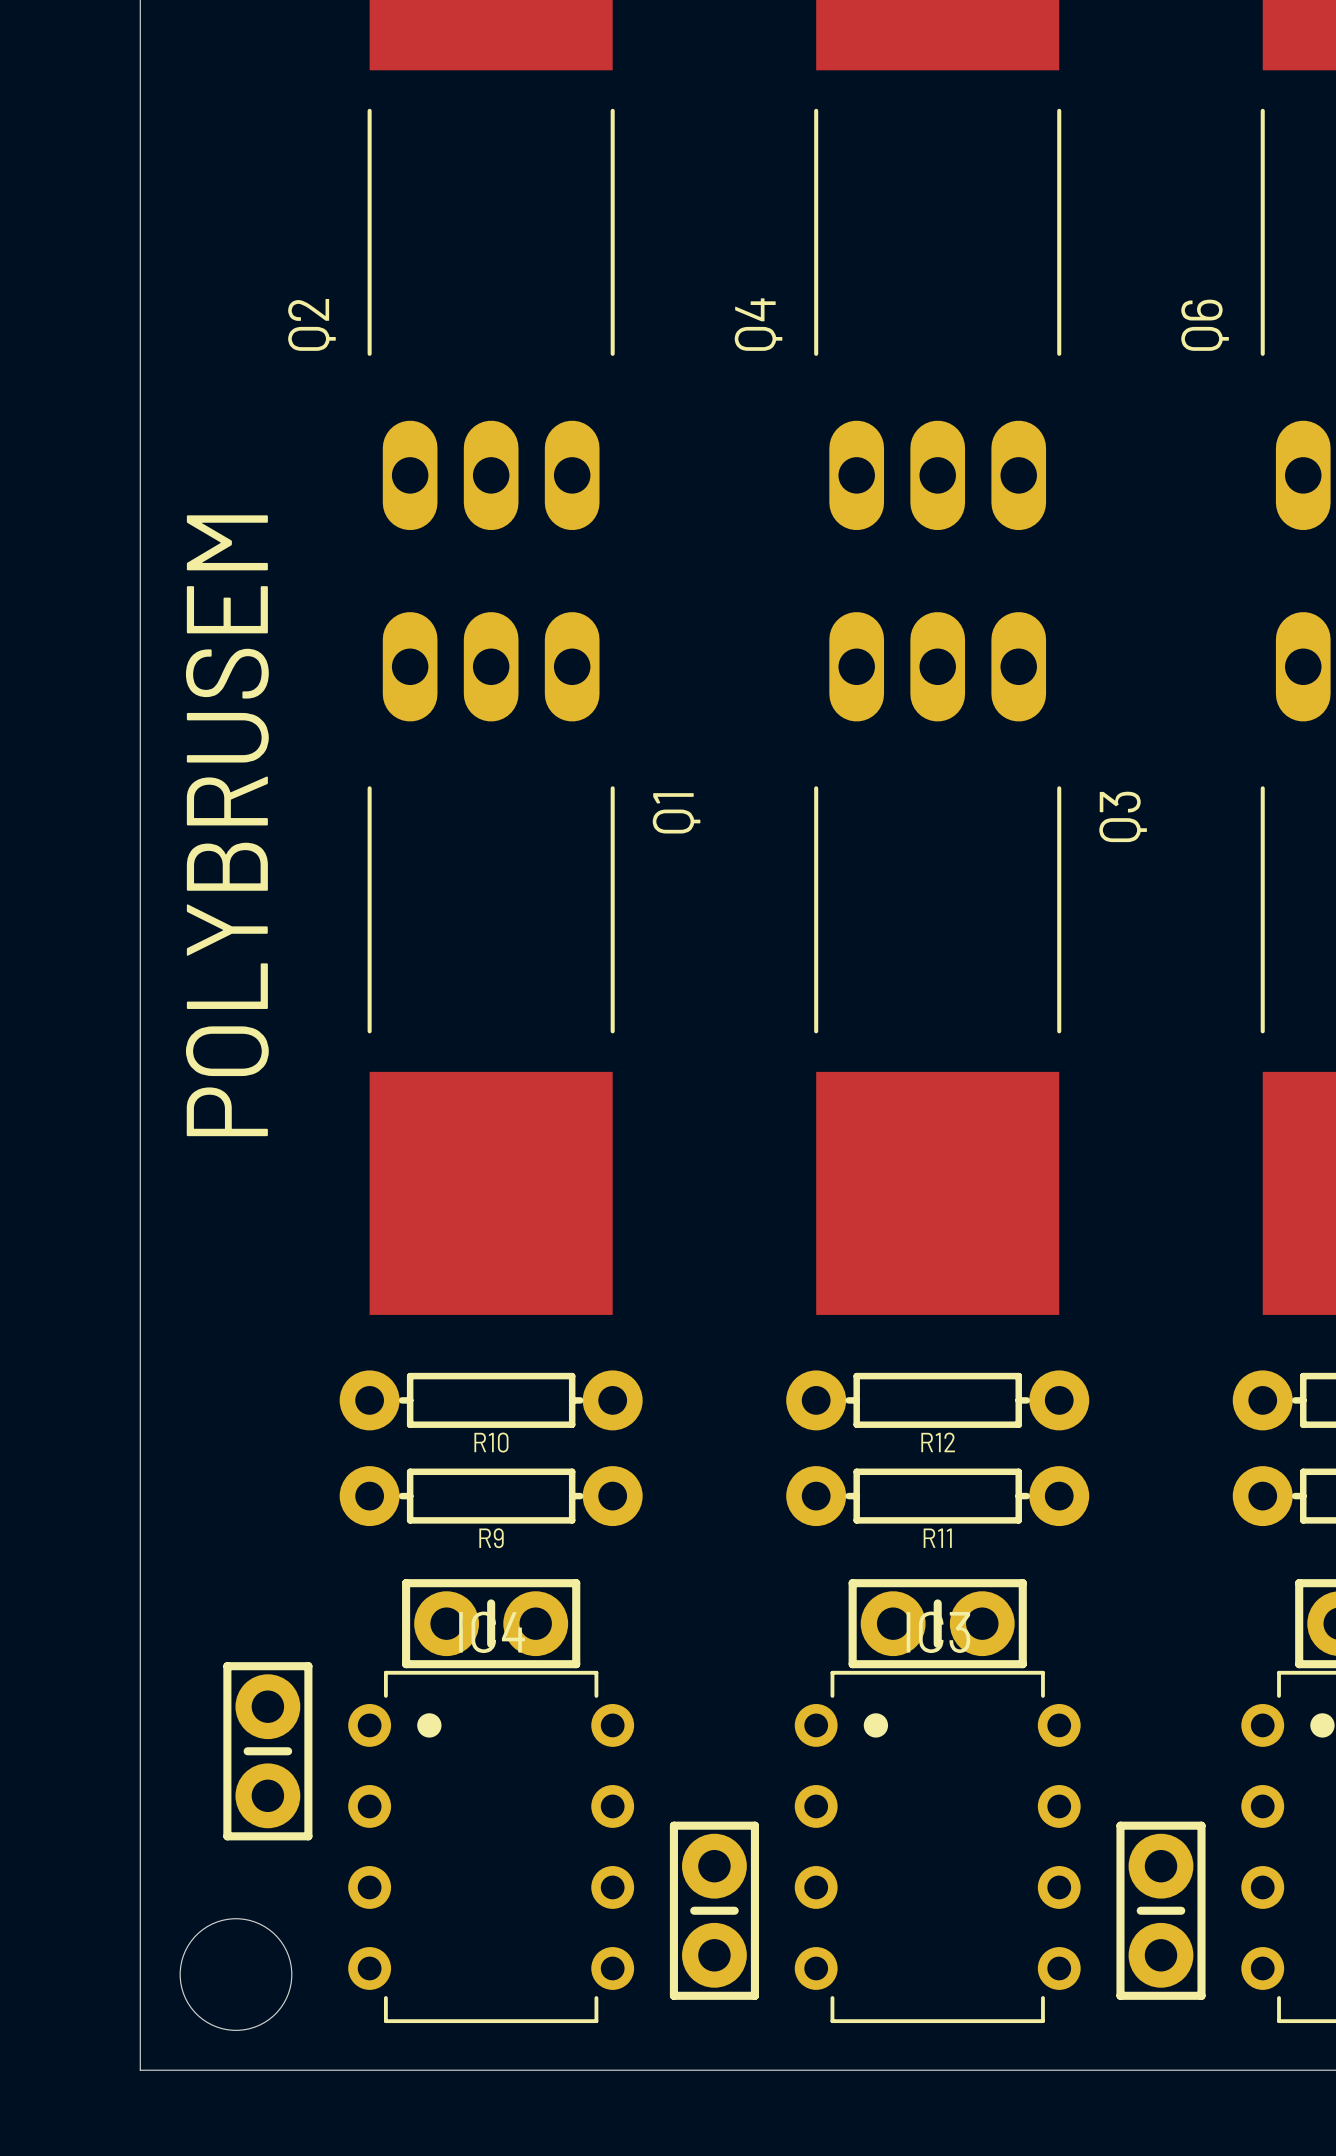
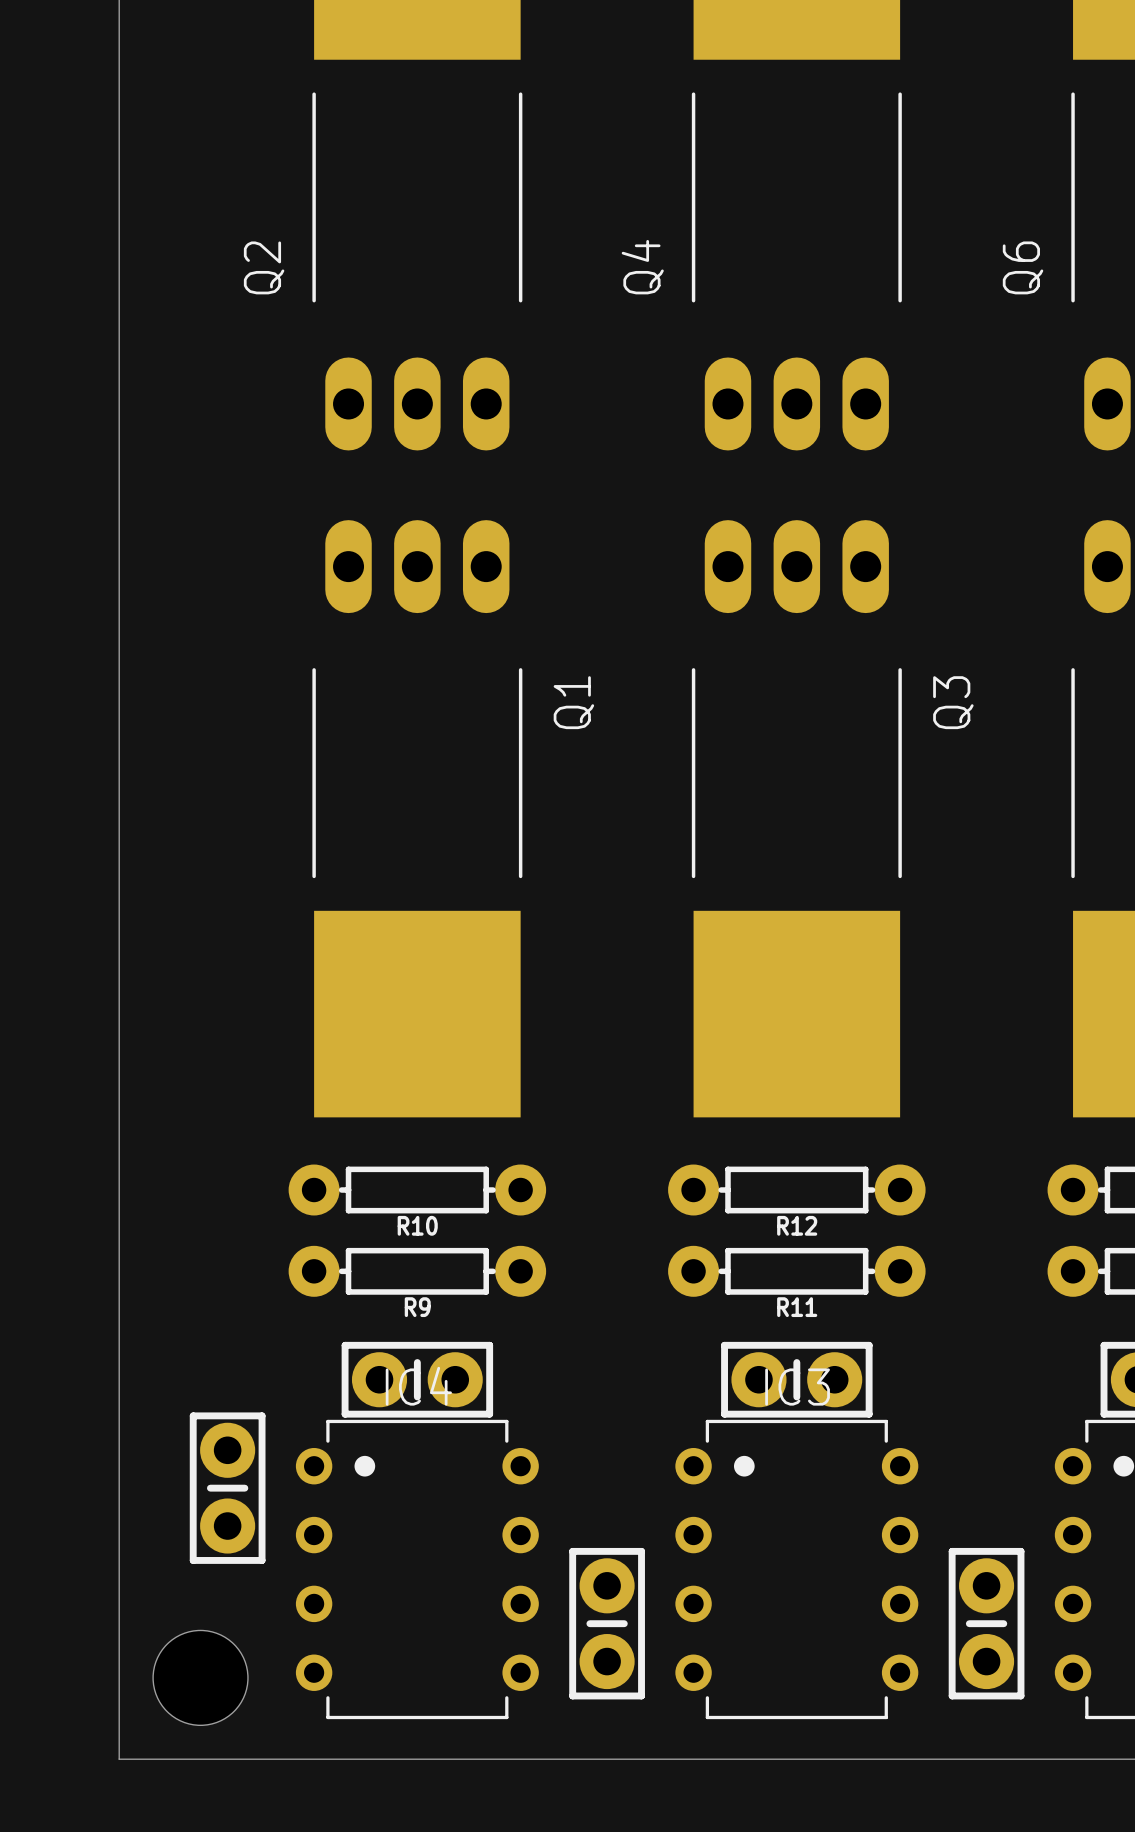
text: POLYBRUSEM (227, 825) -> none

